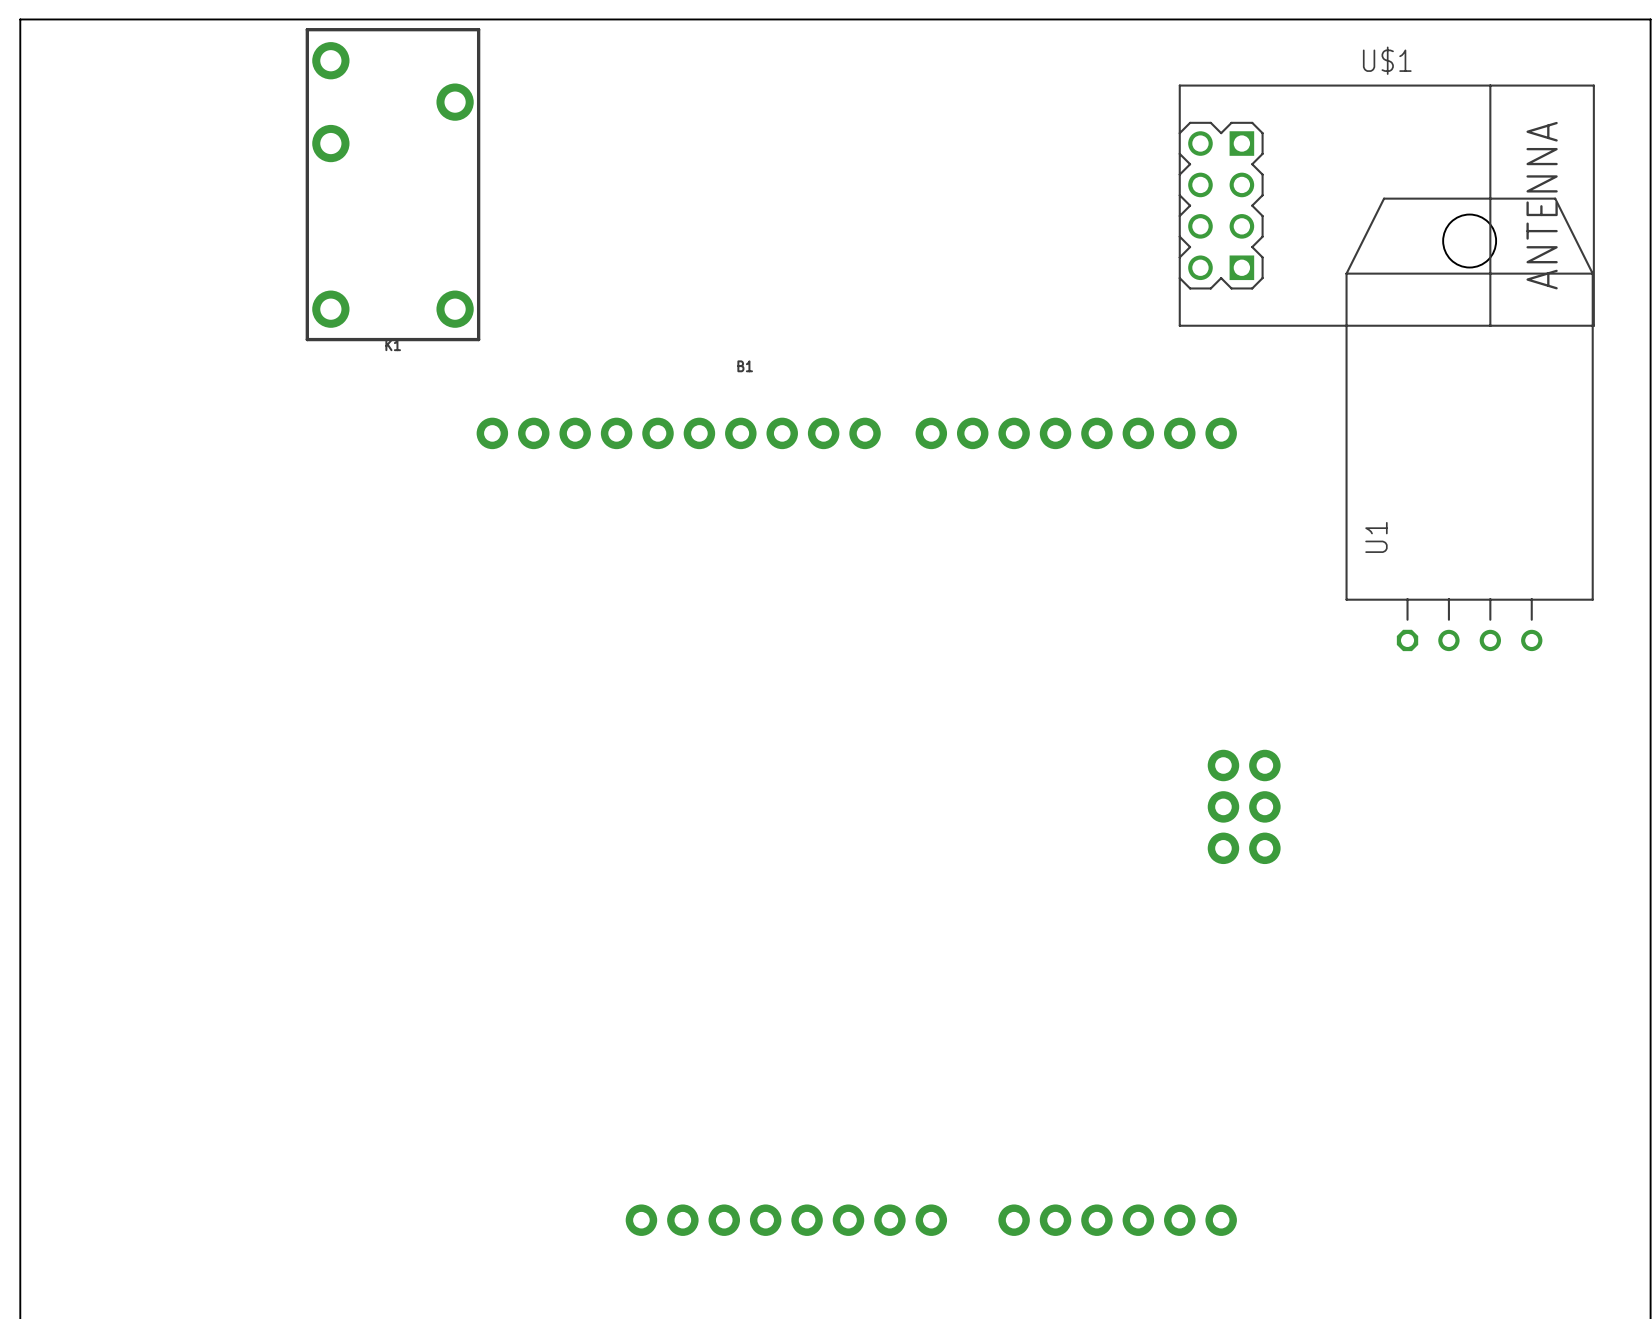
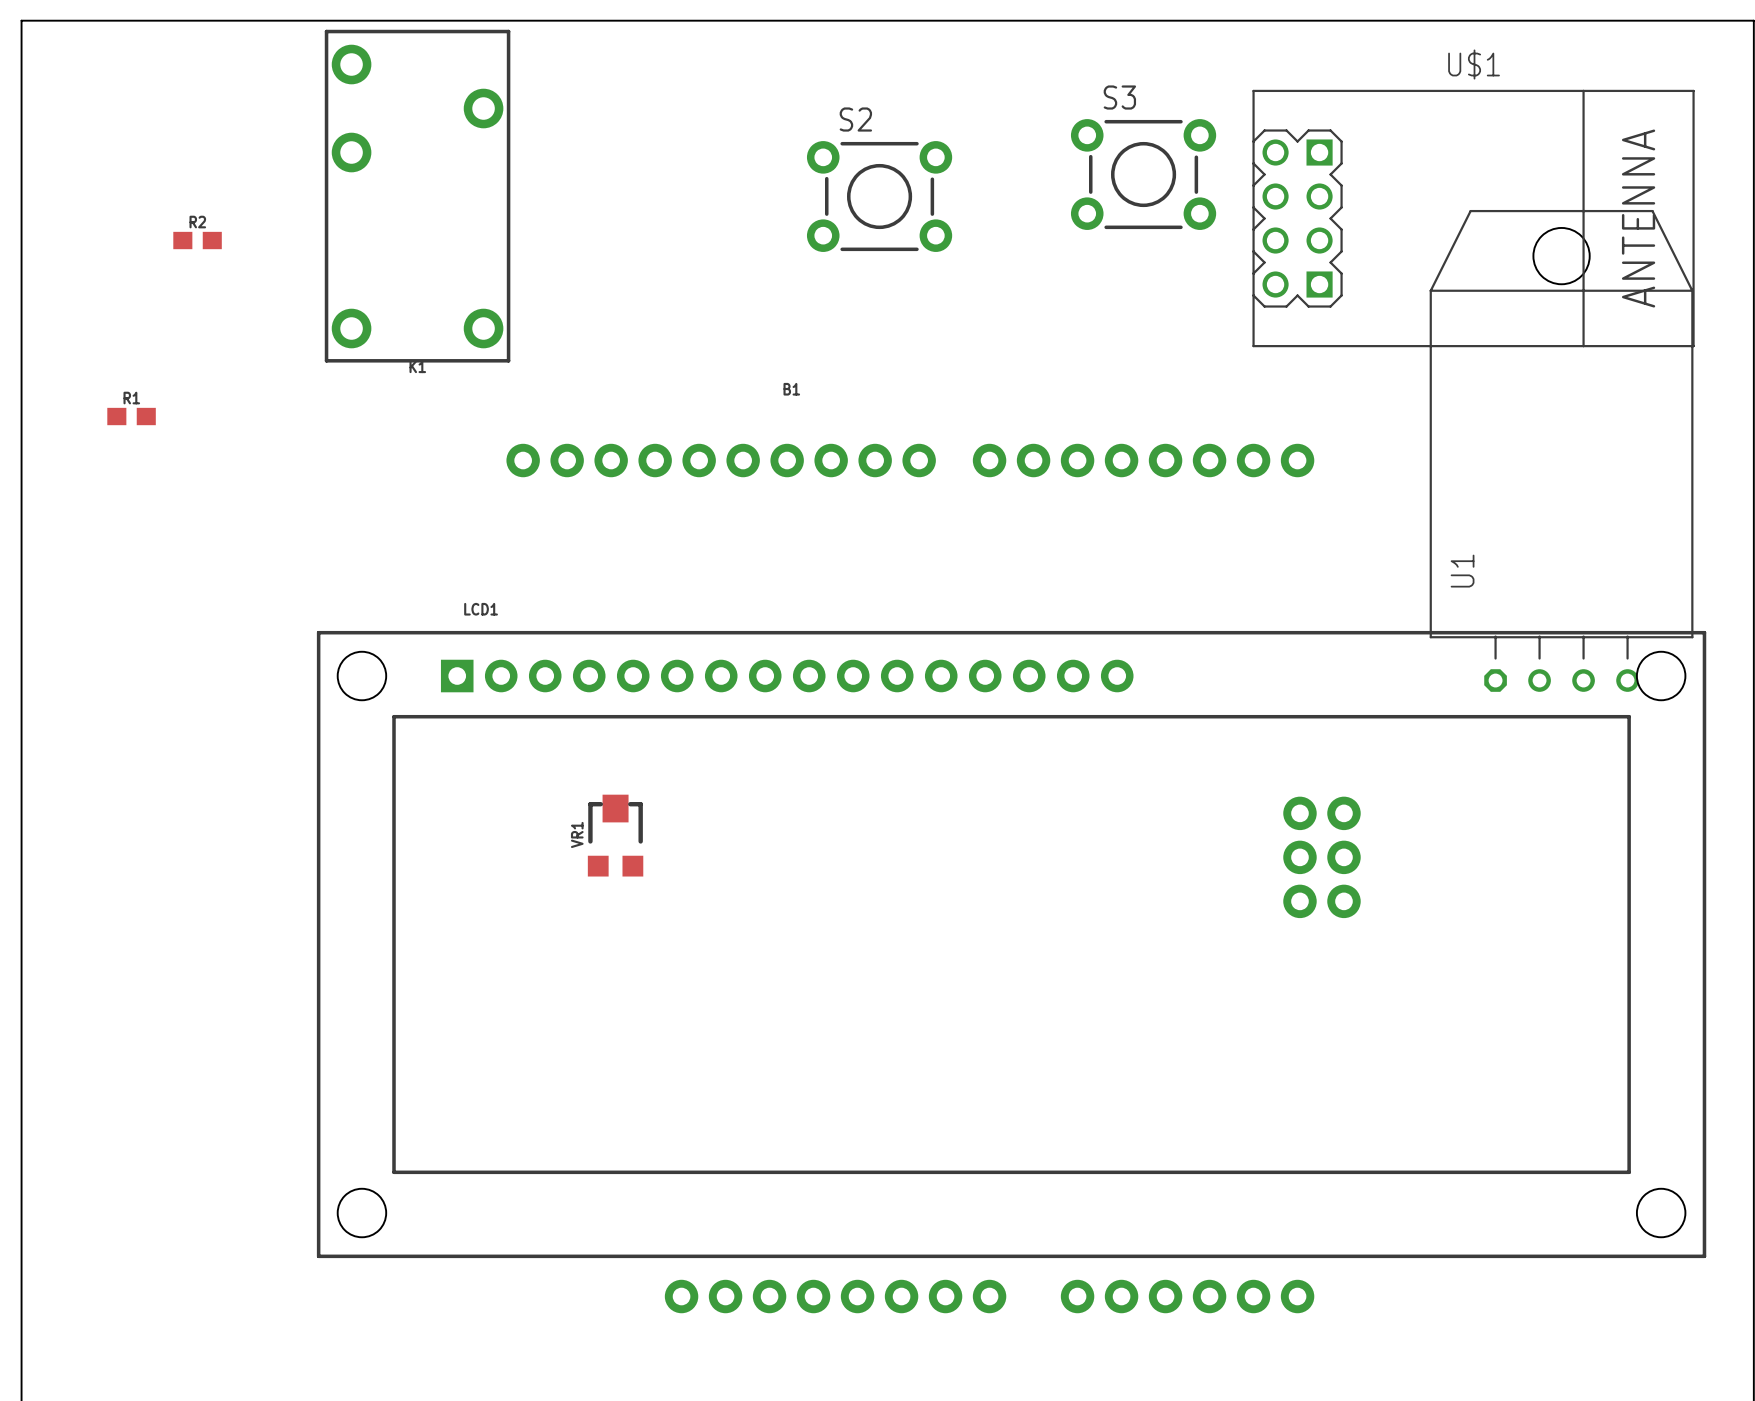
S3: none -> (1143, 174)
S2: none -> (879, 196)
R2: none -> (197, 240)
R1: none -> (131, 416)
VR1: none -> (615, 835)
LCD1: none -> (1011, 944)

